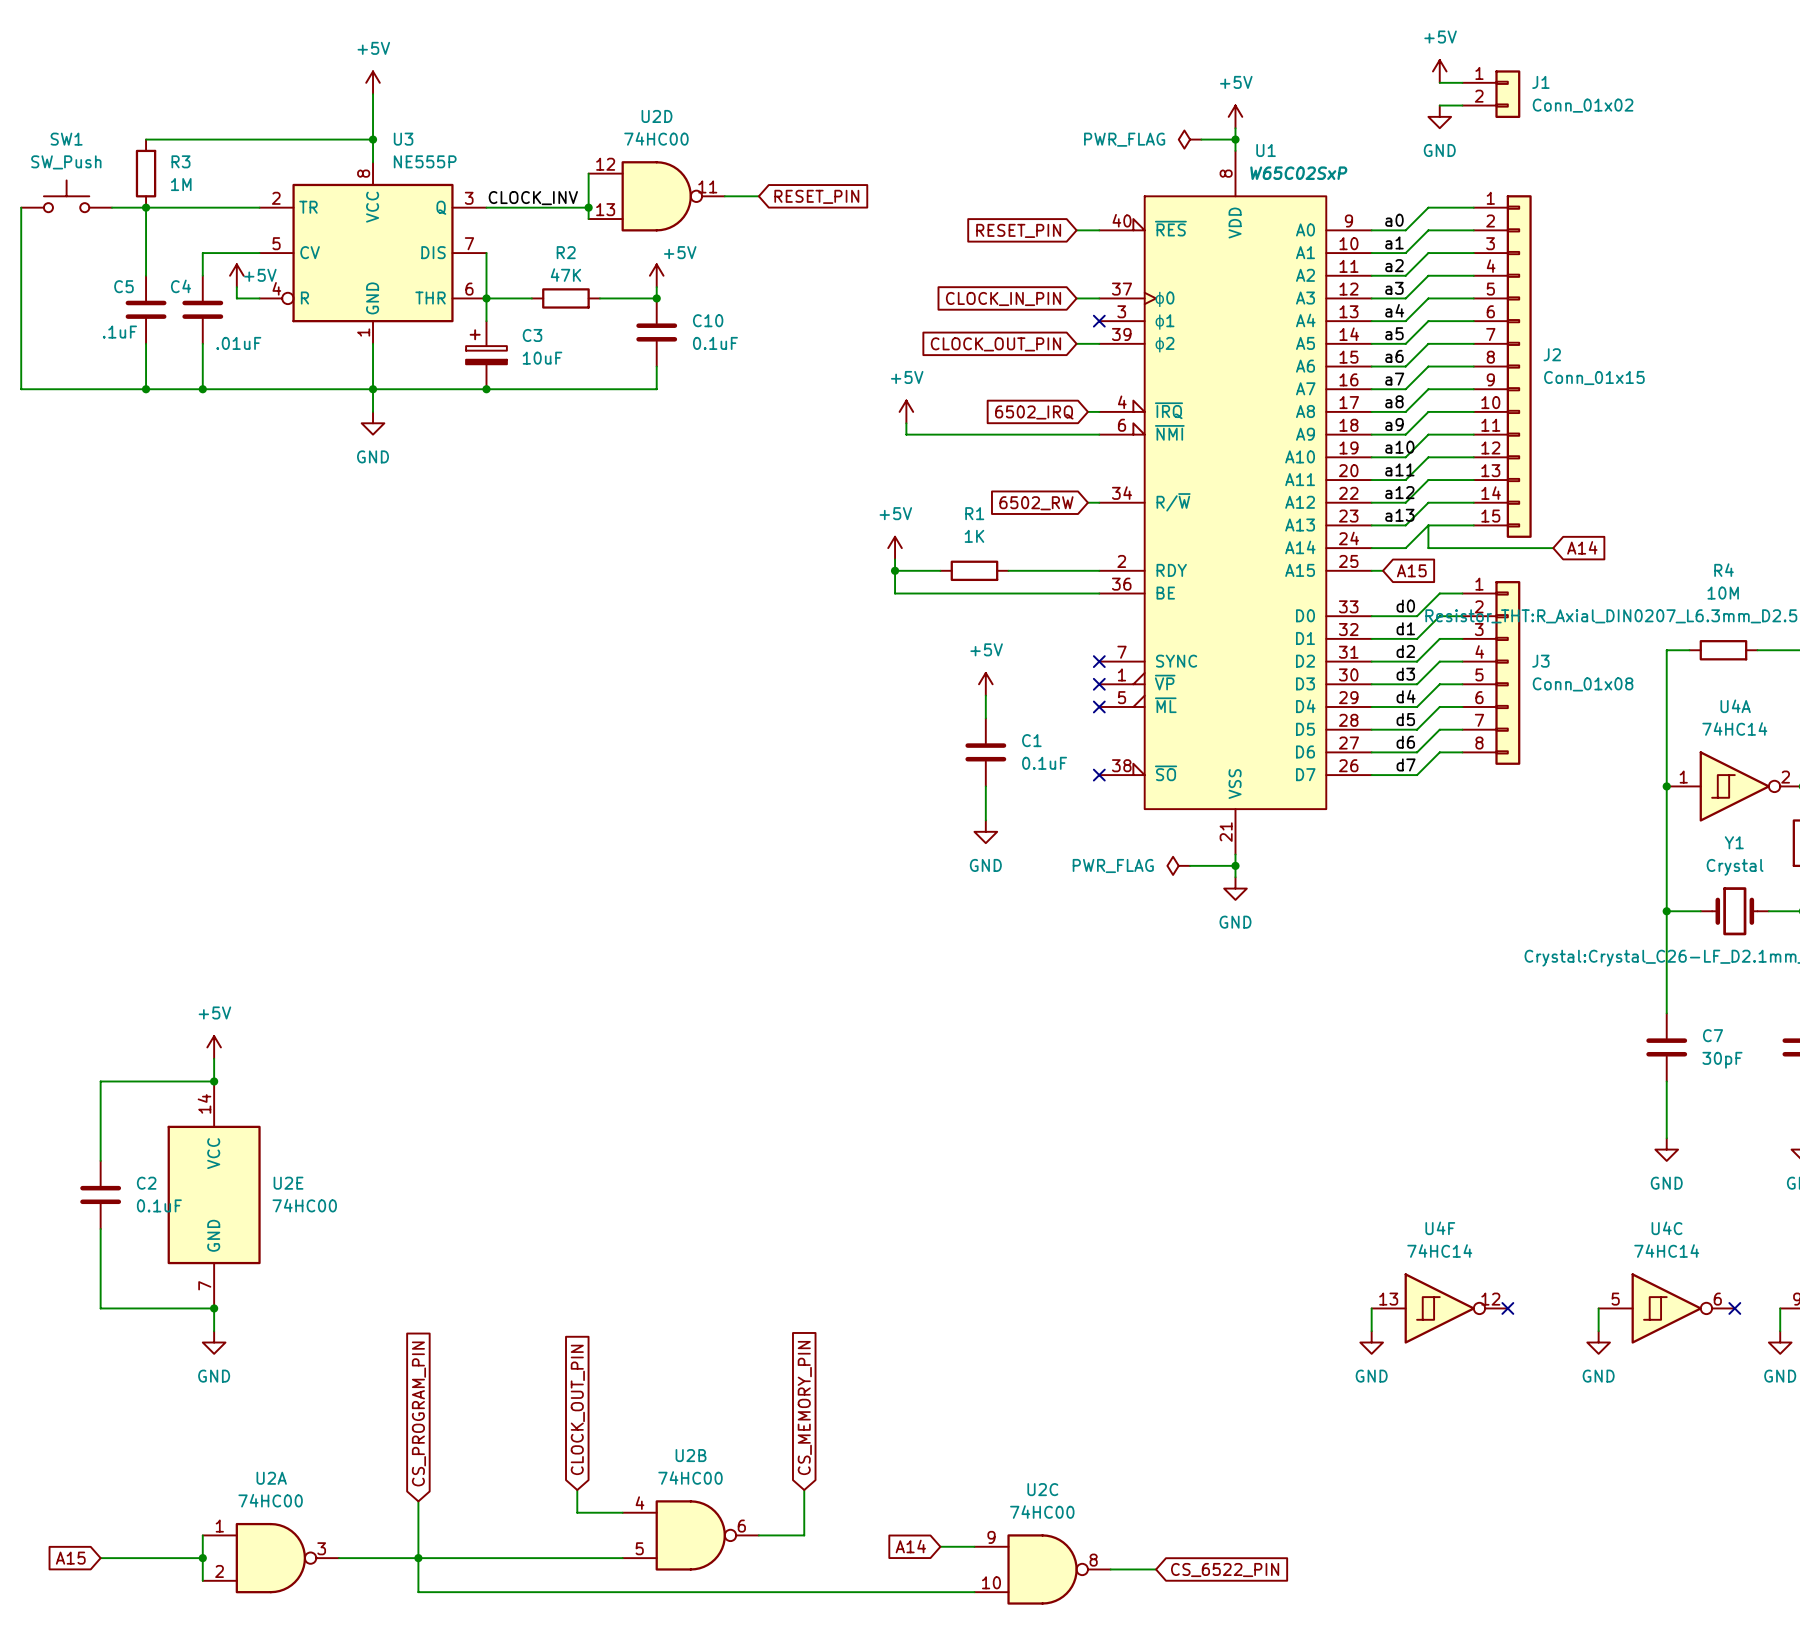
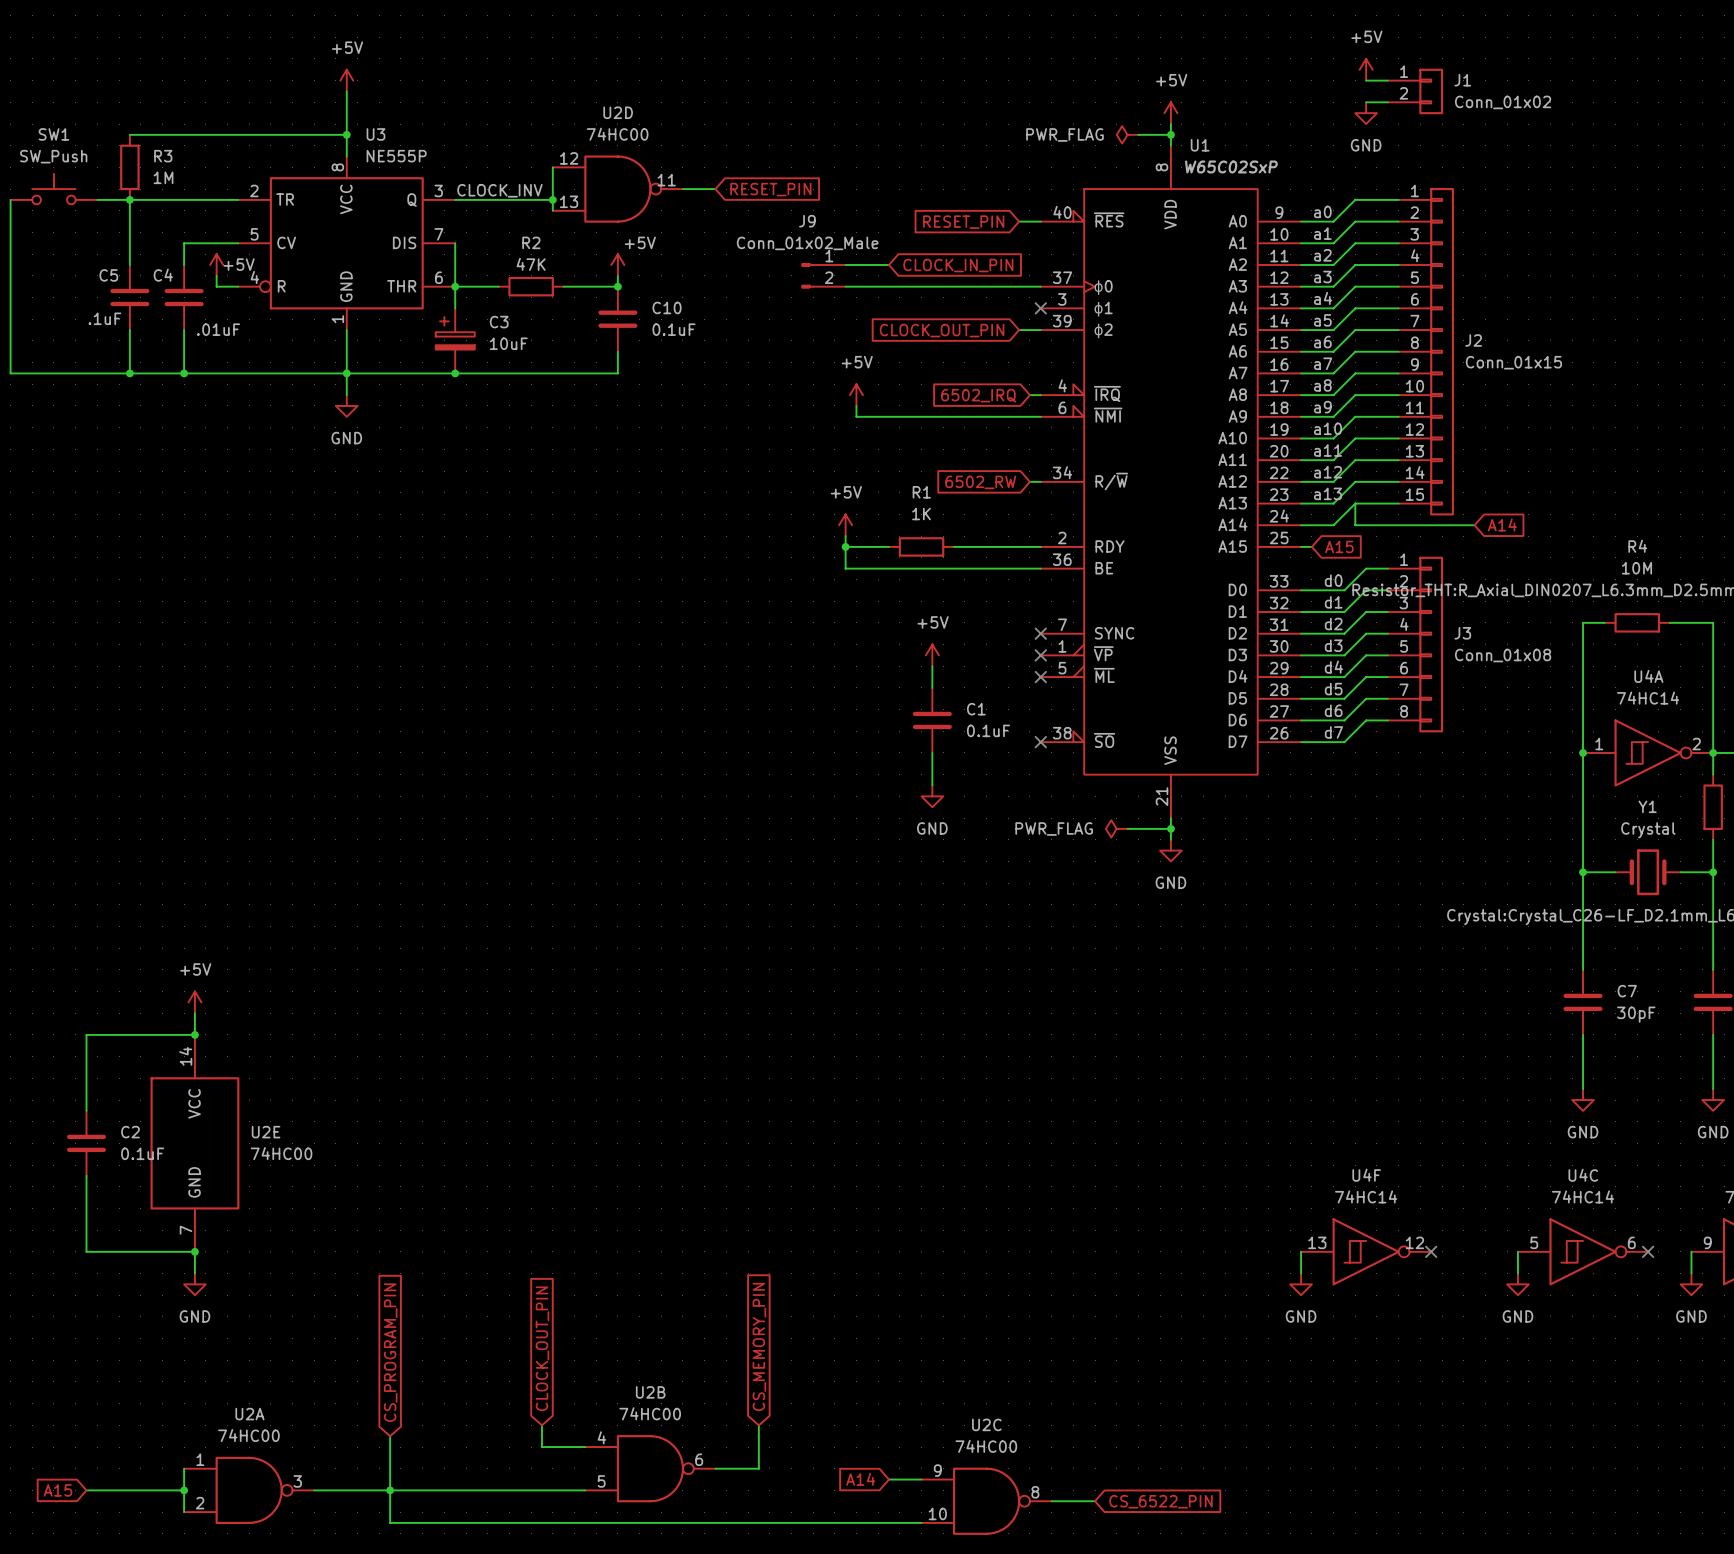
wire: none -> (845, 264) (888, 264)
J9: none -> Conn_01x02_Male (823, 275)
wire: none -> (845, 286) (1019, 286)
global label rotation: 0° (1003, 298) -> 180° (958, 265)

